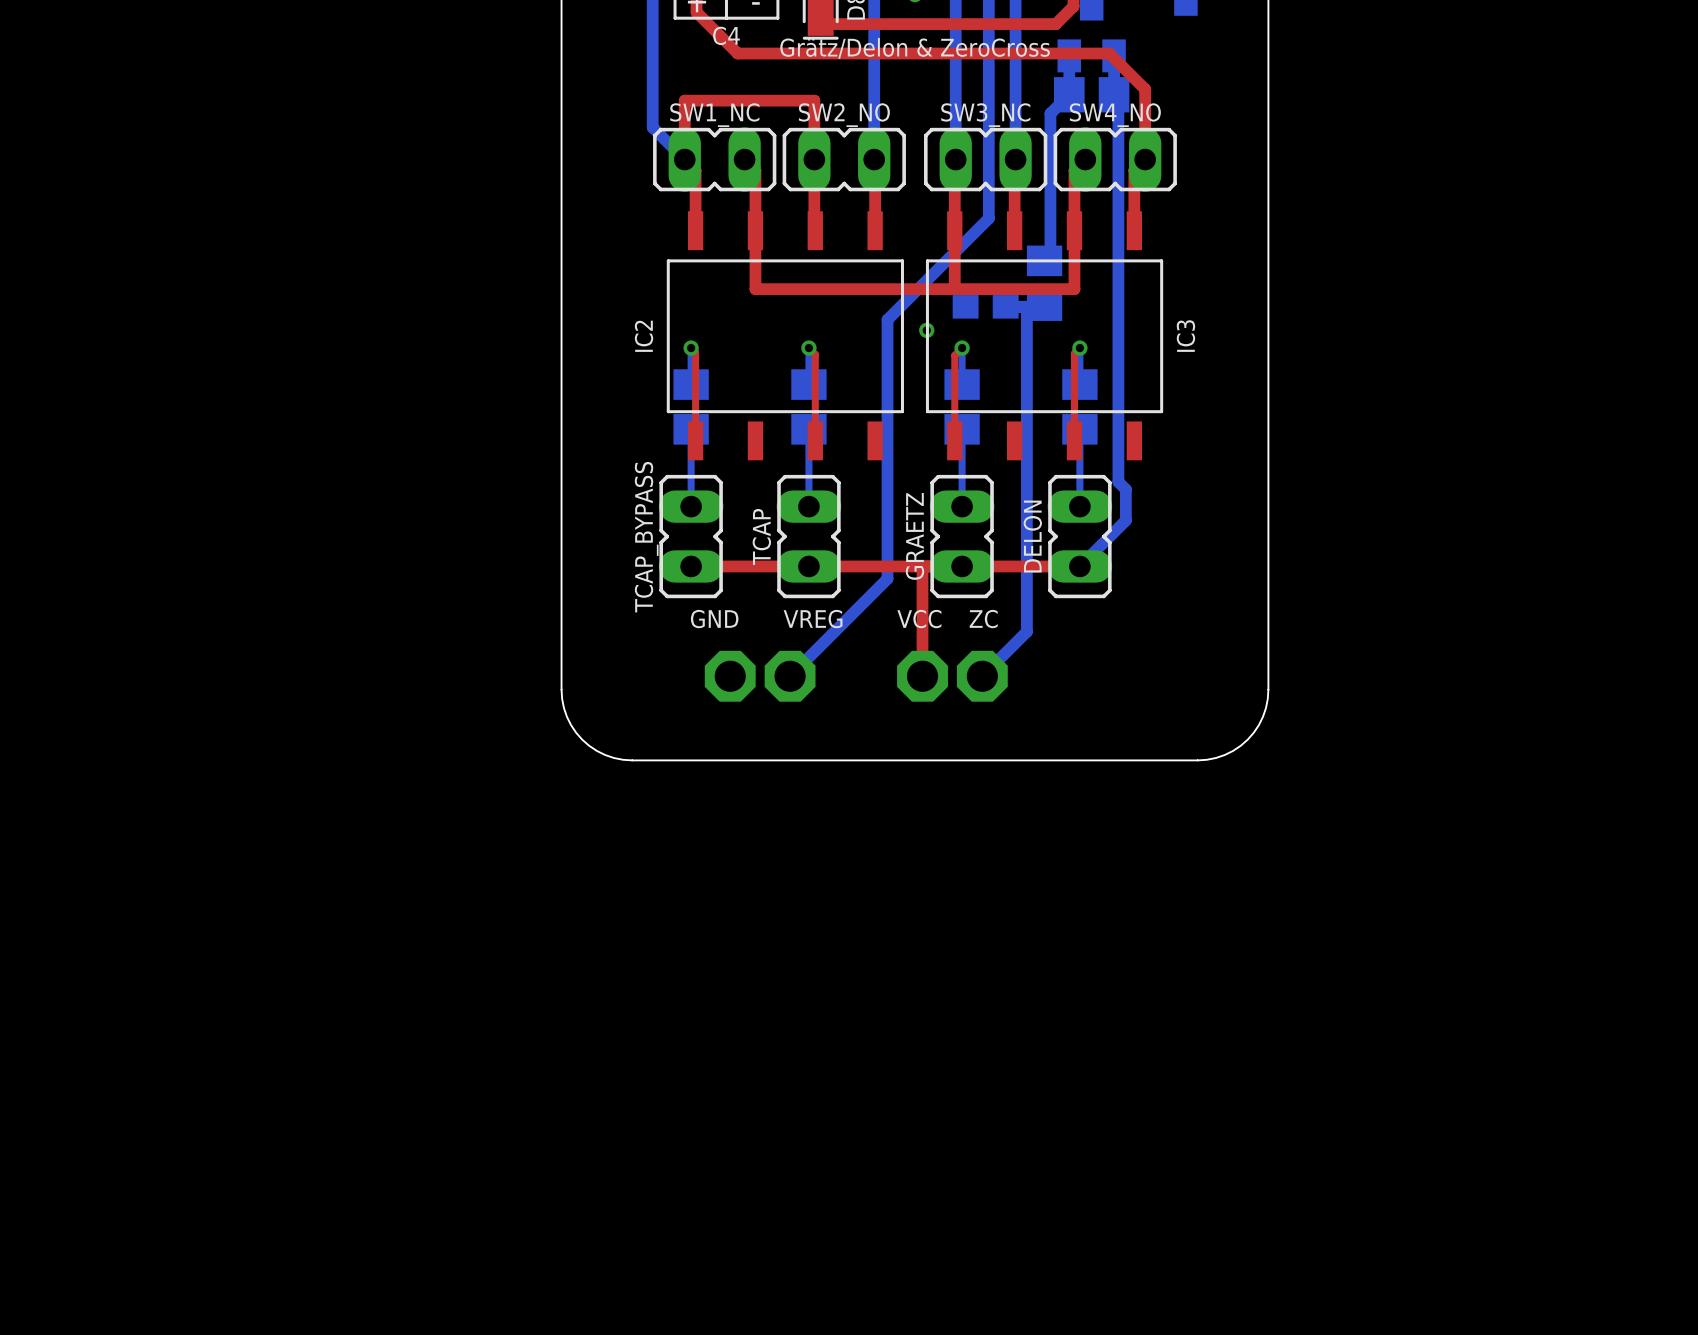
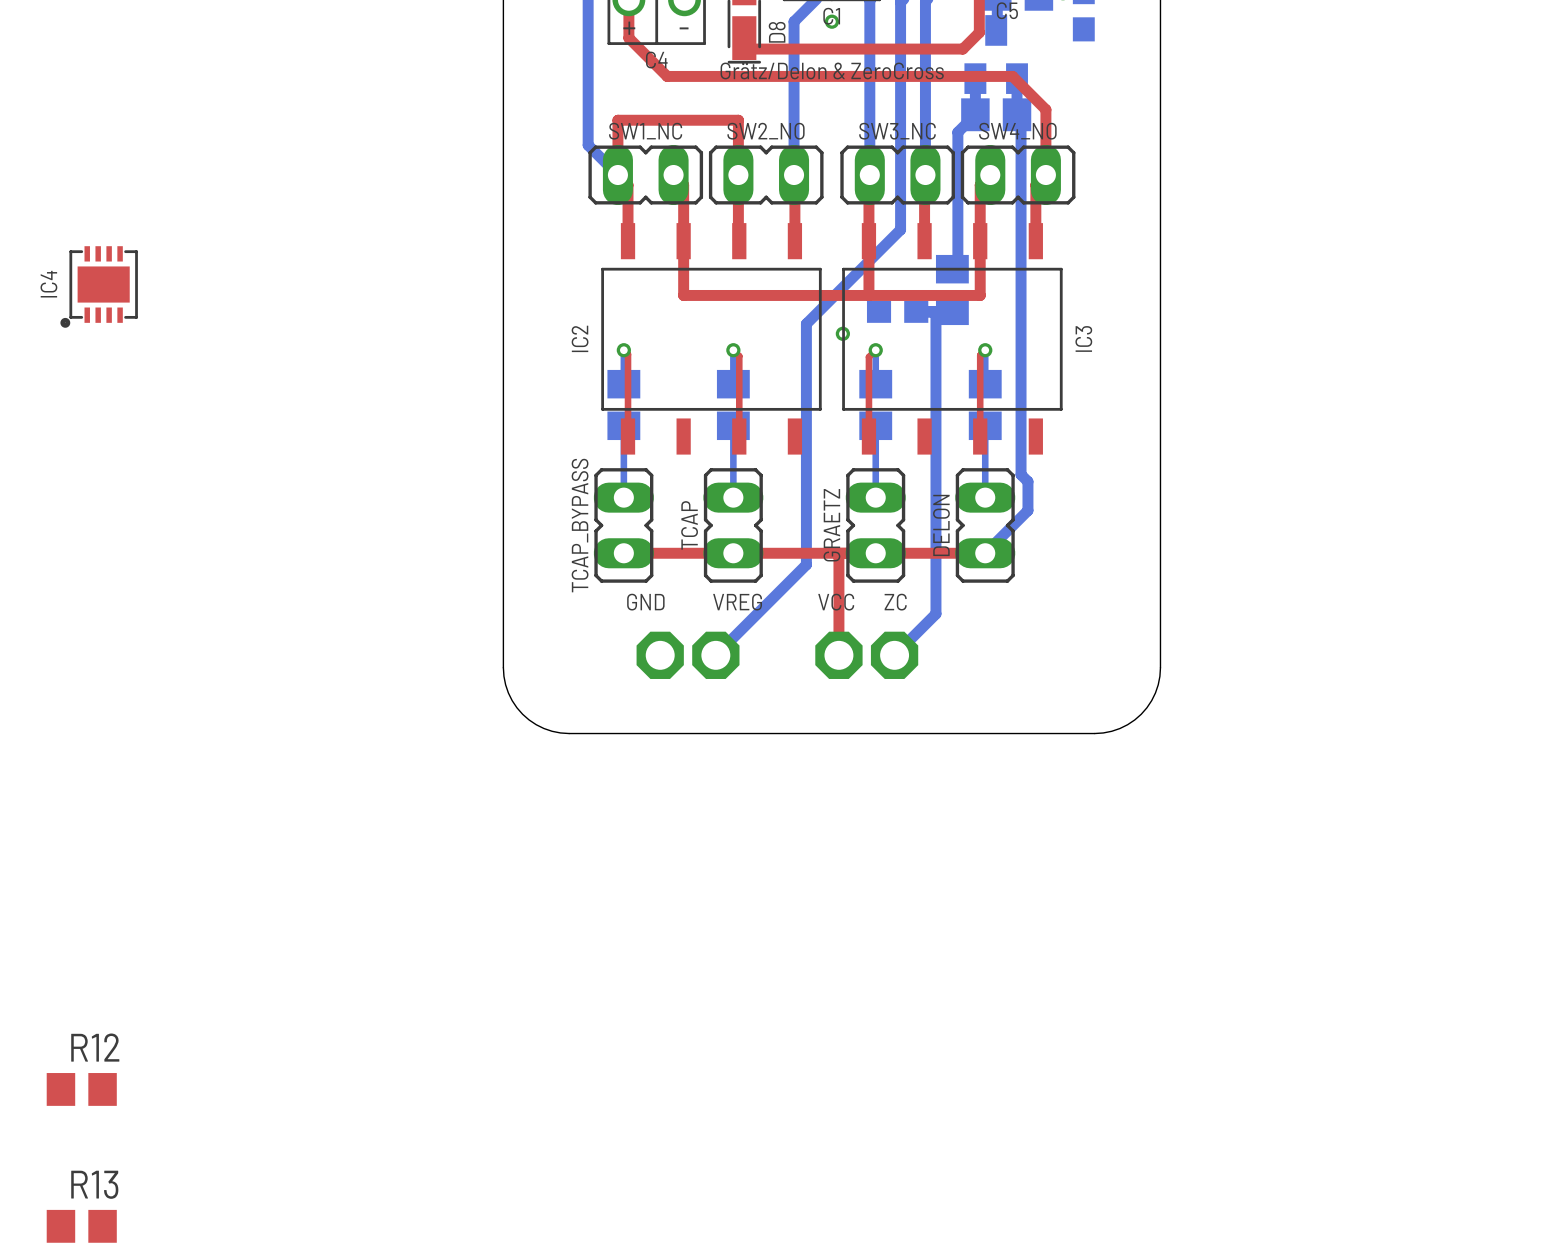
IC4: none -> (99, 286)
R12: none -> (81, 1089)
R13: none -> (81, 1226)

